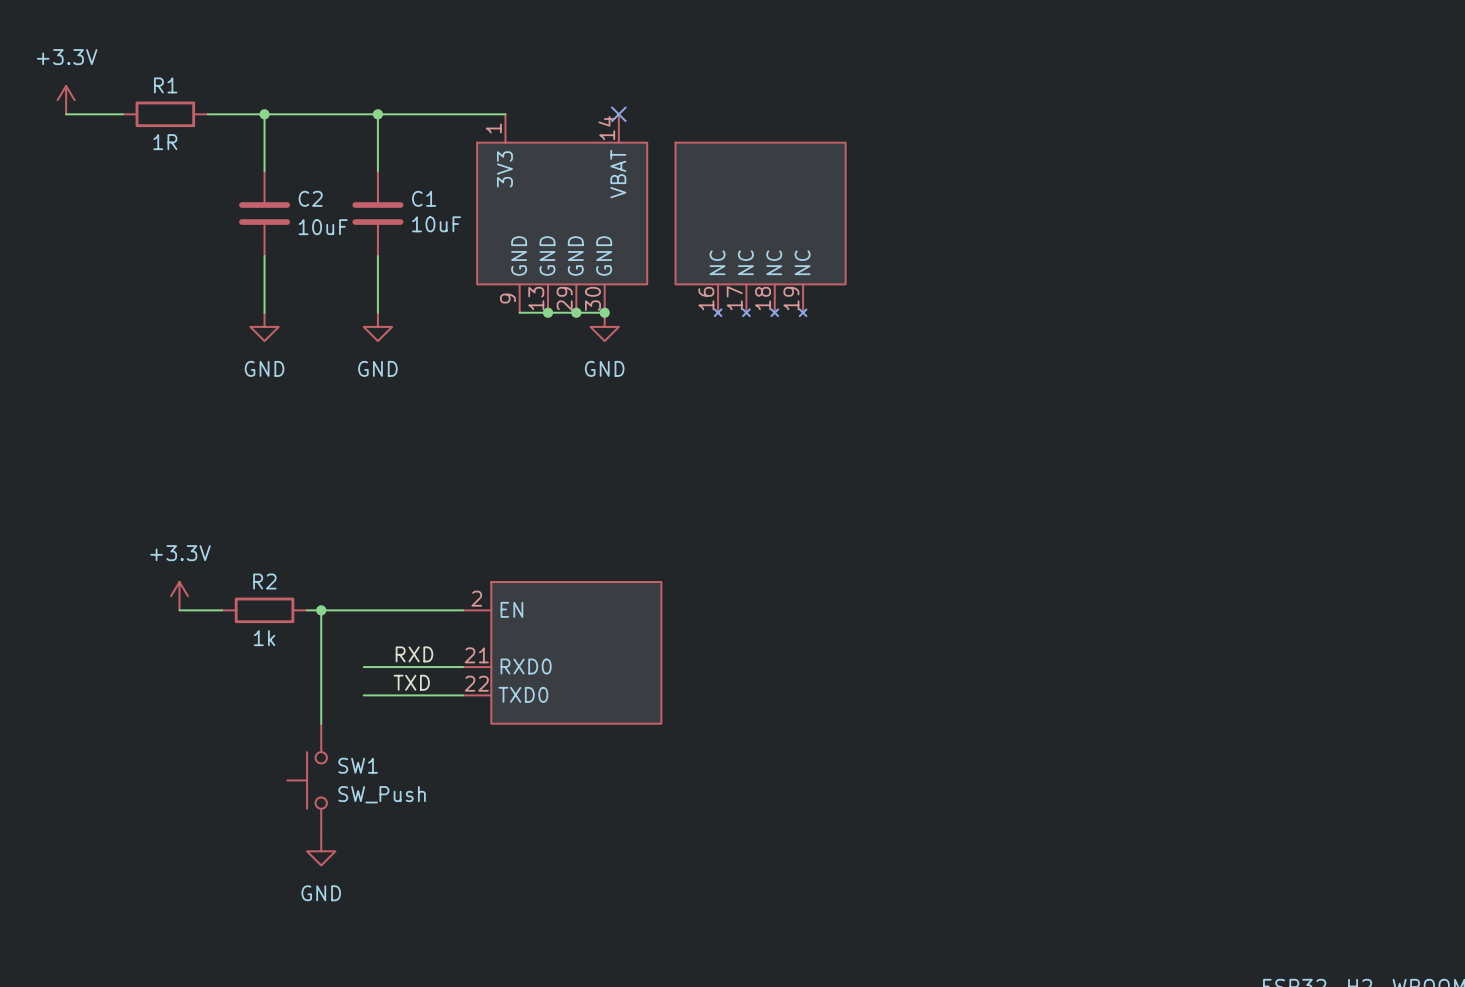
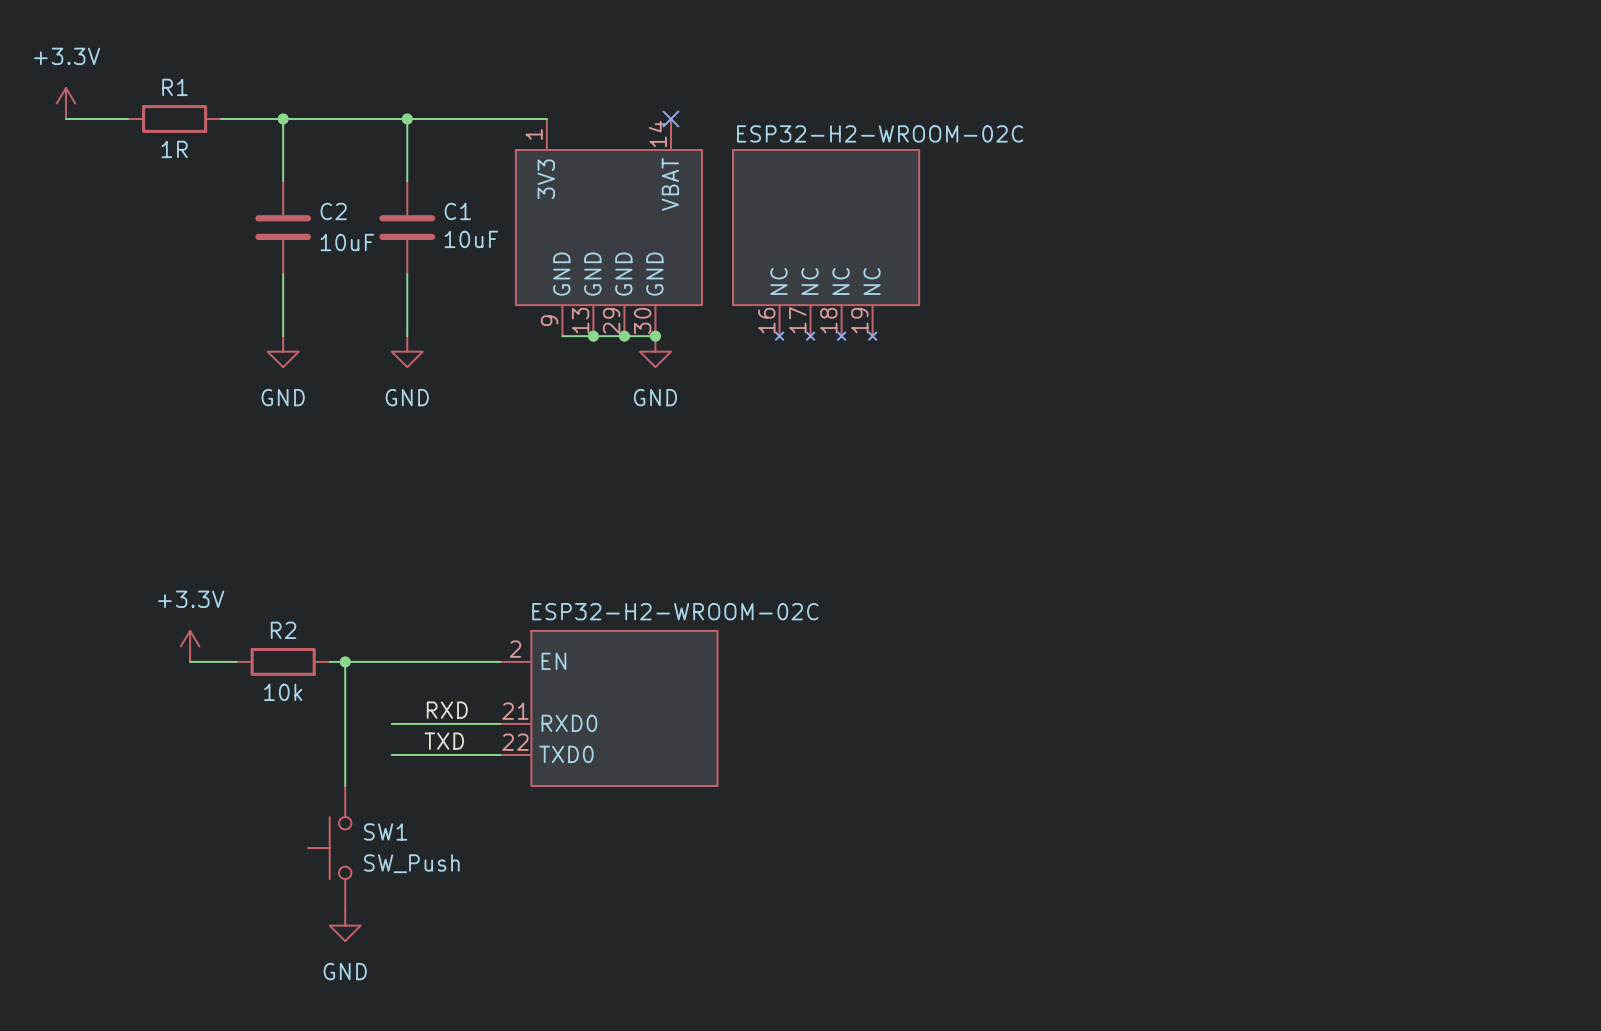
part value: none -> ESP32-H2-WROOM-02C (880, 133)
part value: none -> ESP32-H2-WROOM-02C (675, 611)
R2 value: 1k (264, 638) -> 10k (283, 692)

